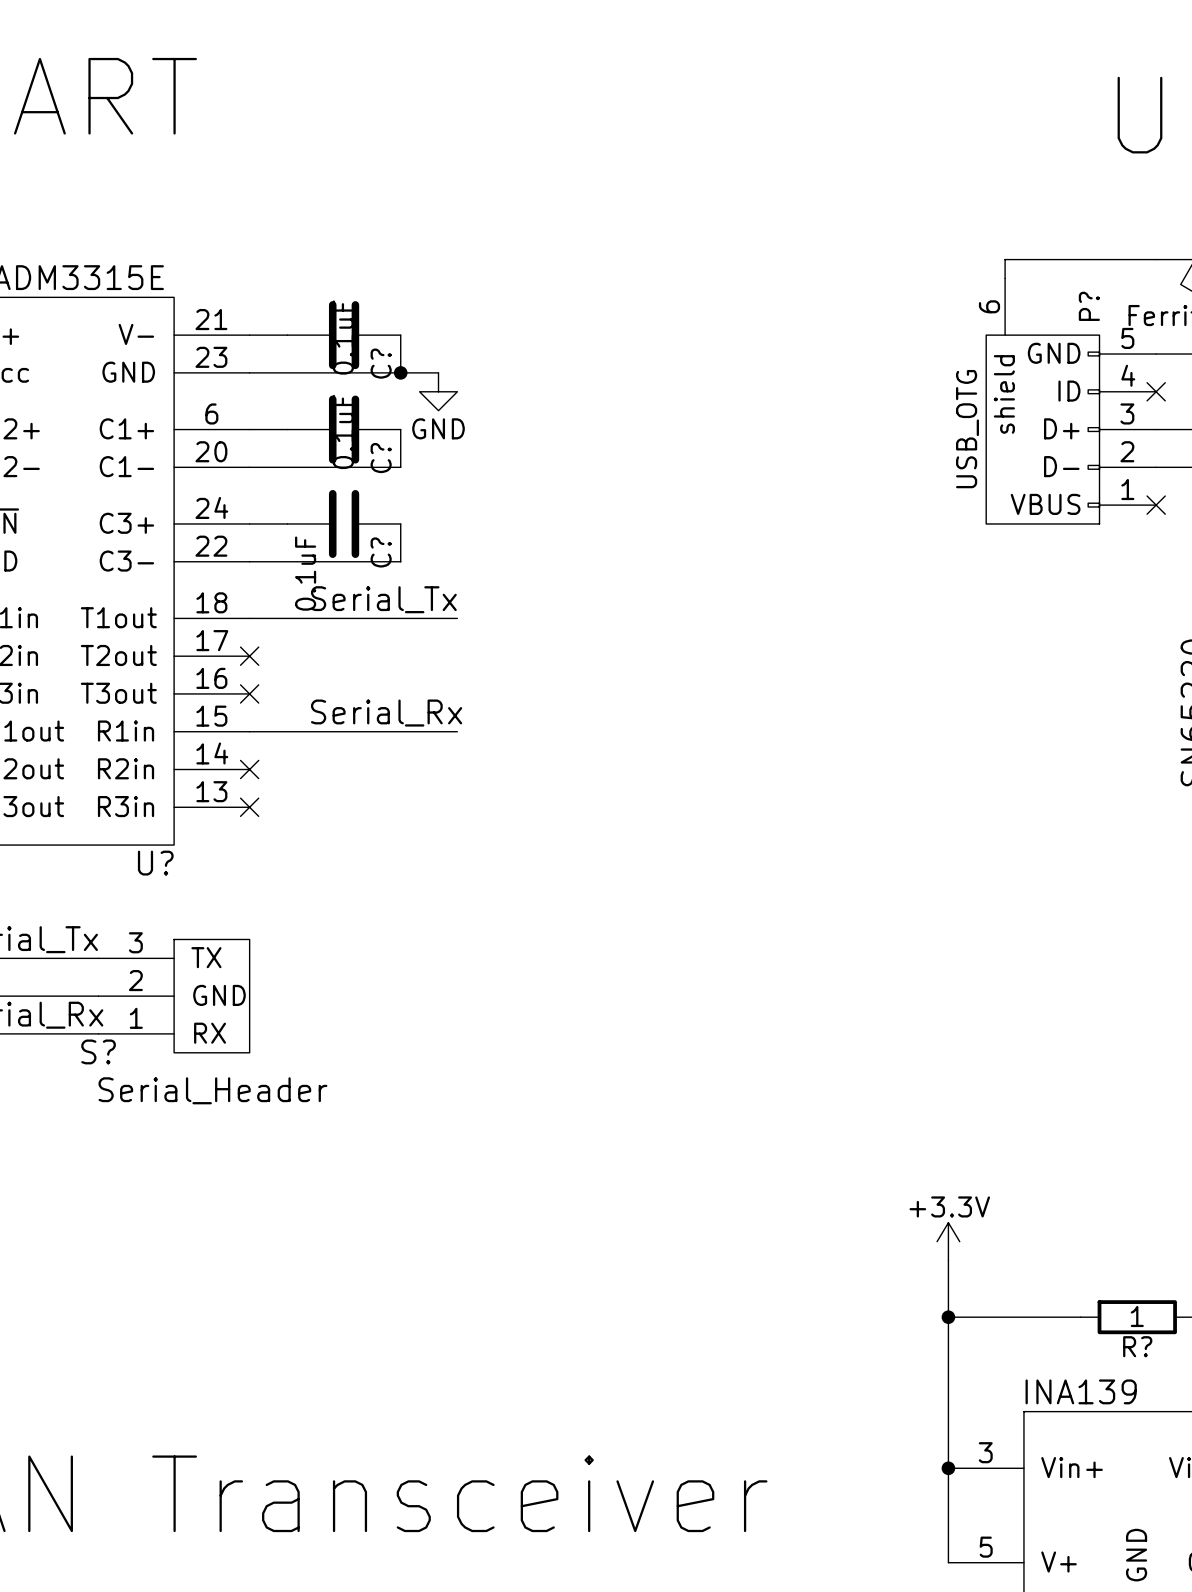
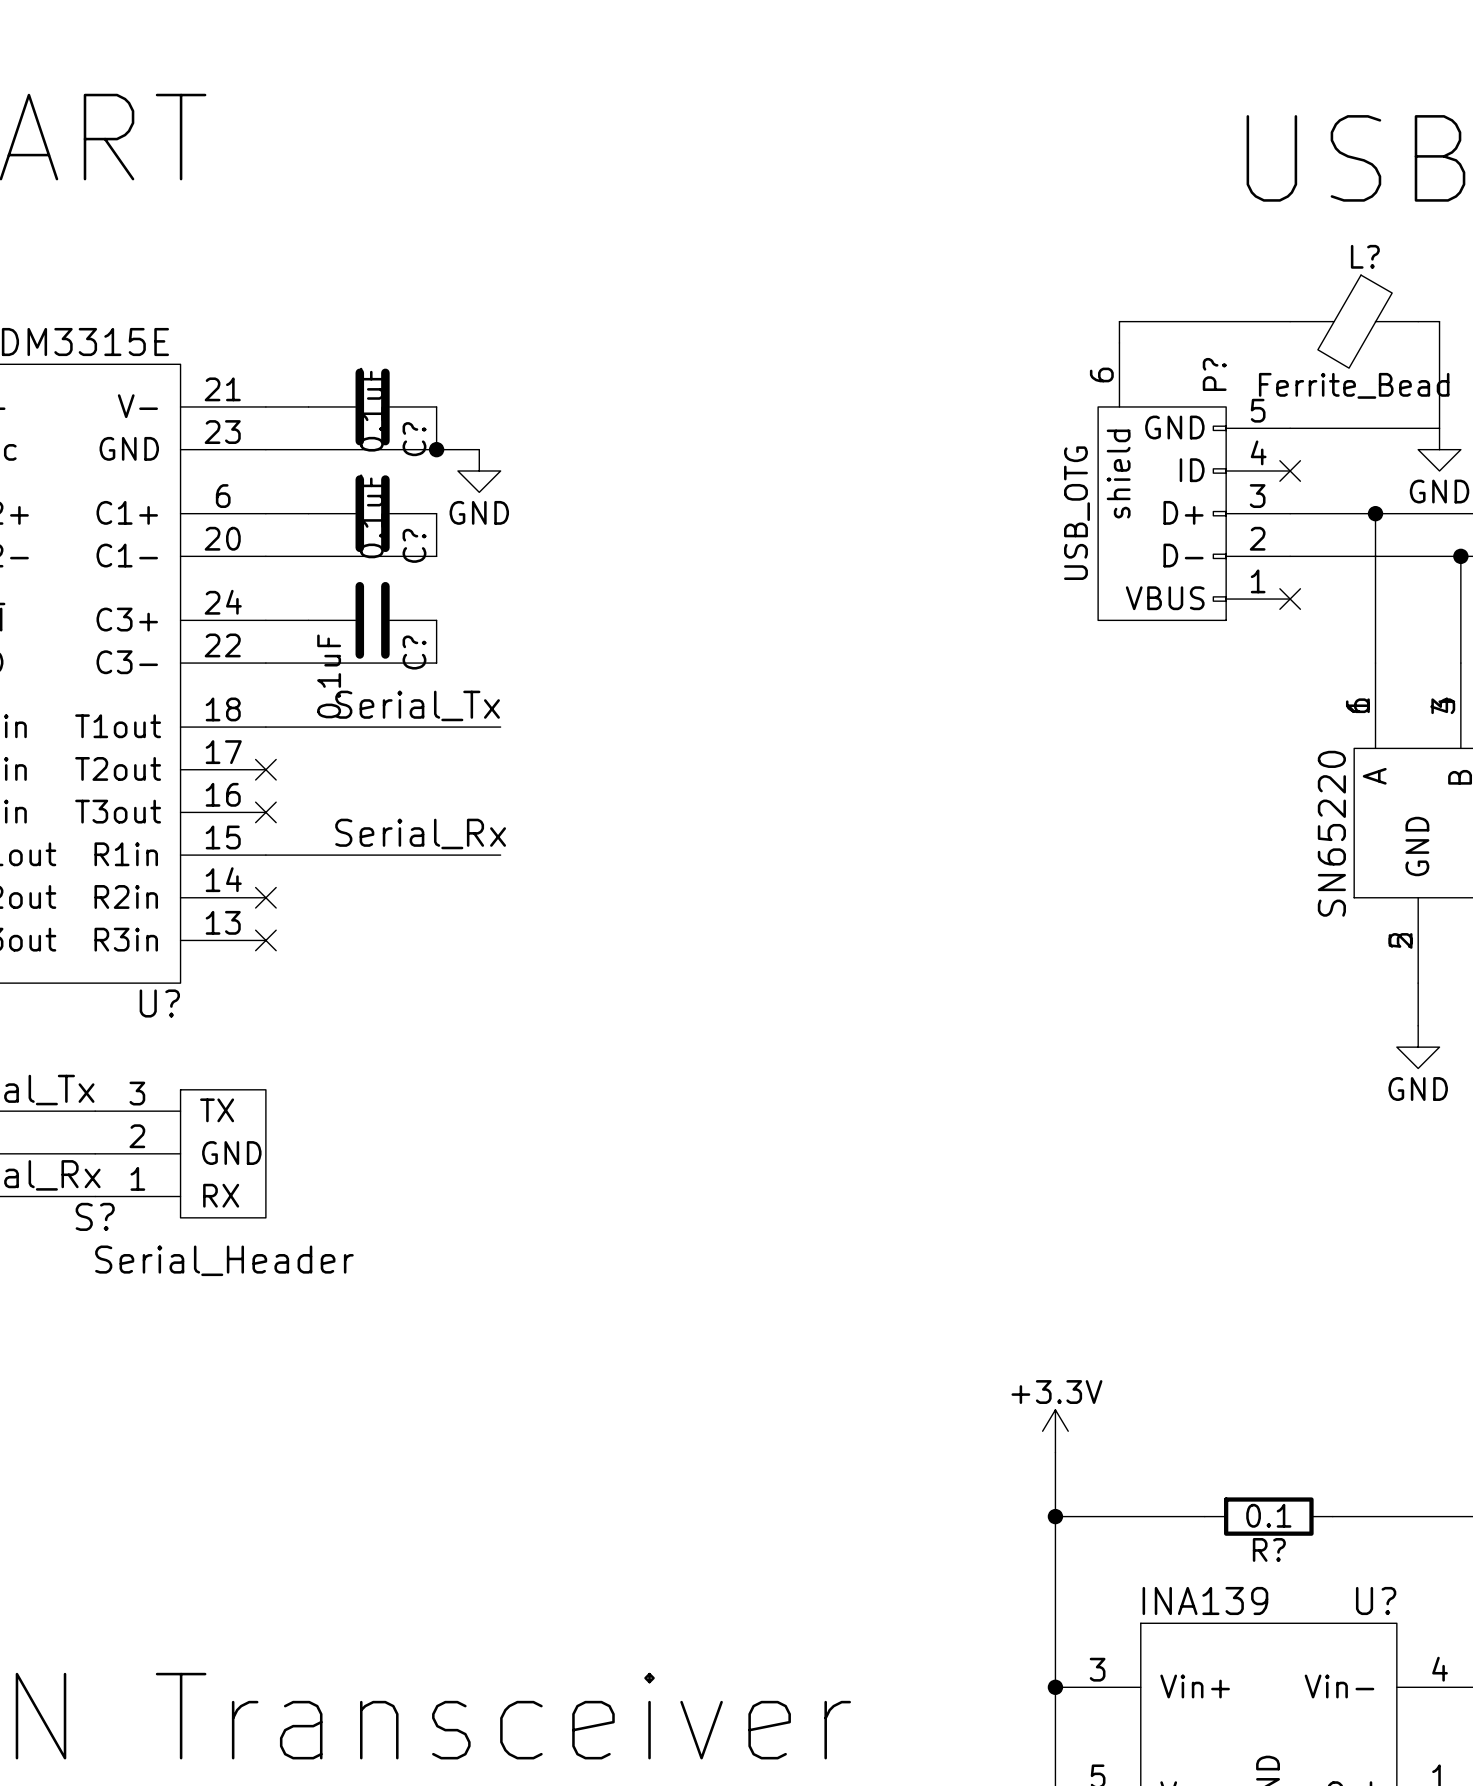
R? value: 1 (1137, 1316) -> 0.1 (1268, 1515)

